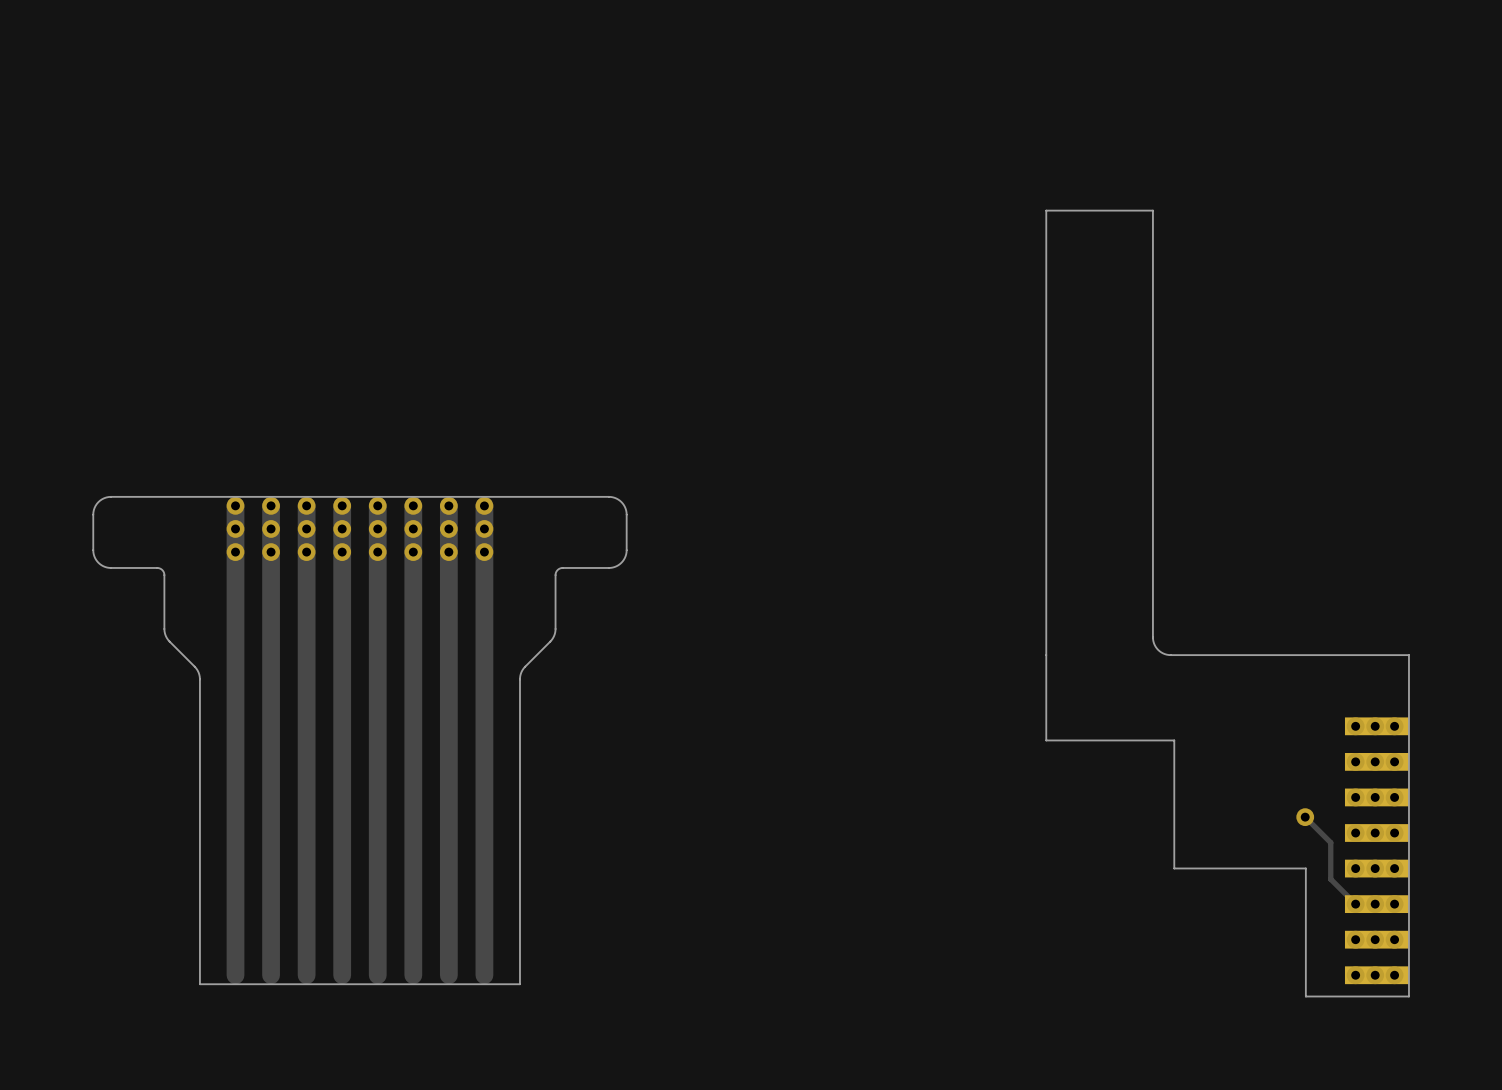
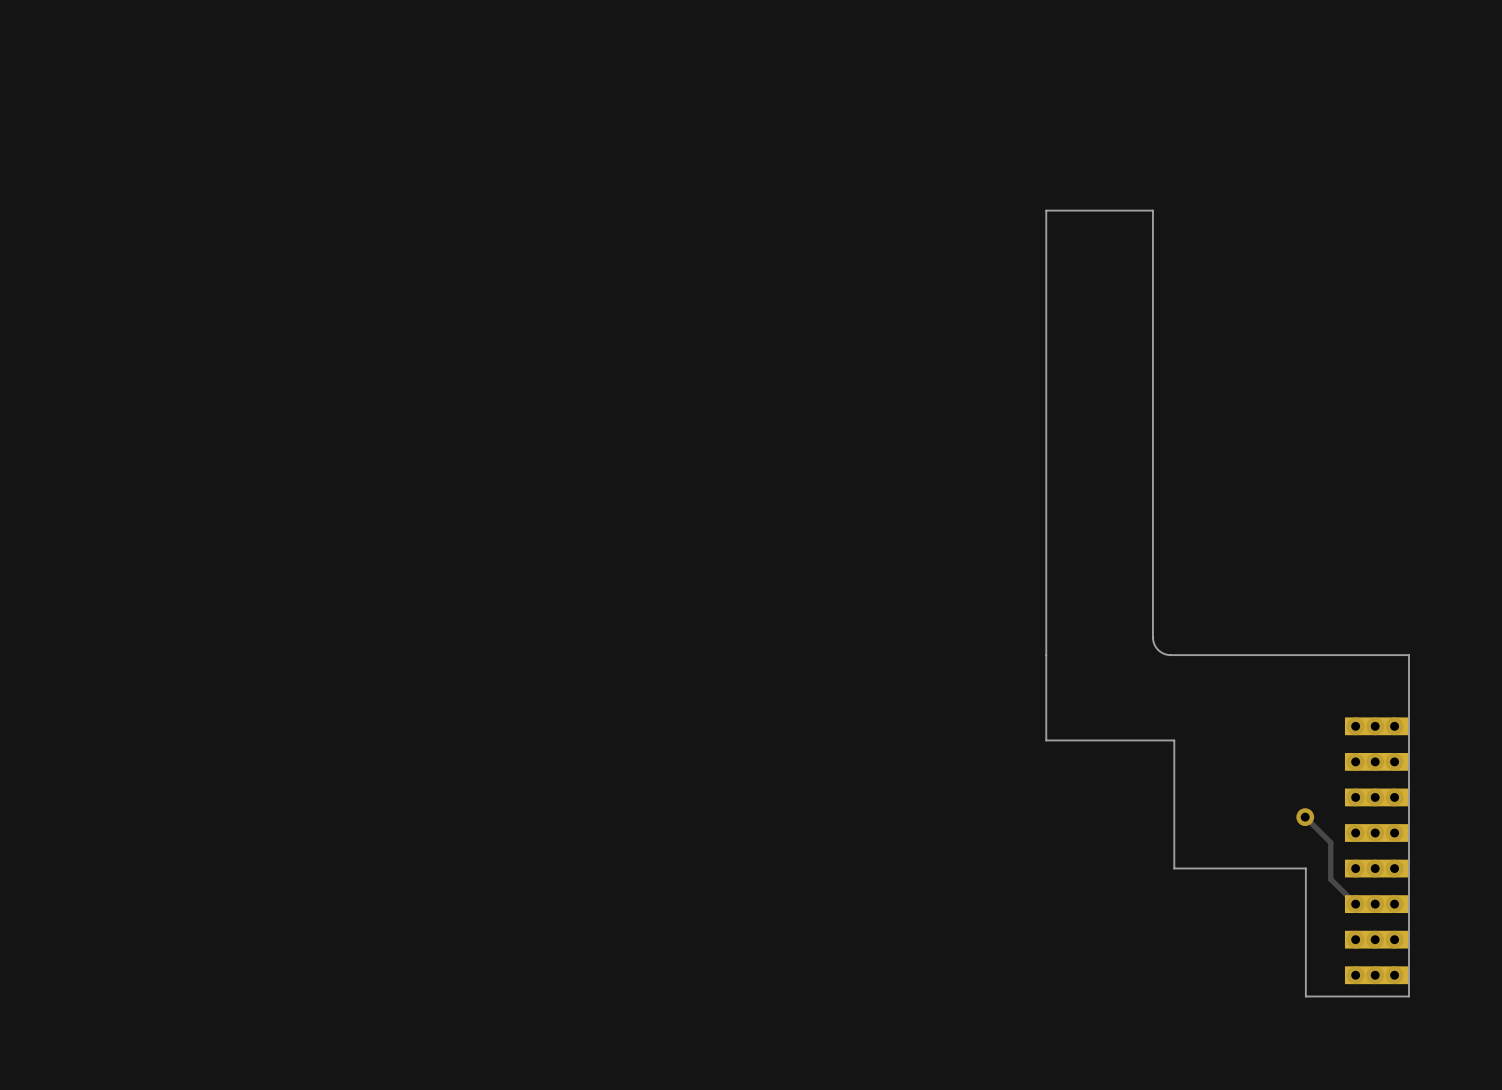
board edge: (608, 496) (111, 496) (104, 498) (96, 503) (93, 514) (93, 552) (95, 559) (101, 565) (109, 567) (157, 567) (162, 570) (164, 575) (165, 635) (196, 668) (199, 674) (199, 984) (519, 984) (520, 675) (524, 667) (550, 641) (554, 634) (555, 575) (557, 570) (562, 567) (612, 567) (619, 564) (624, 557) (626, 550) (626, 510) (619, 500) (608, 496) -> none
track: (235, 505) (235, 975) -> none
via: (235, 505) -> none
track: (271, 505) (271, 975) -> none
via: (271, 505) -> none
track: (306, 505) (306, 975) -> none
via: (306, 505) -> none
track: (342, 505) (342, 975) -> none
via: (342, 505) -> none
track: (377, 505) (377, 975) -> none
via: (377, 505) -> none
track: (413, 505) (413, 975) -> none
via: (413, 505) -> none
track: (448, 505) (448, 975) -> none
via: (448, 505) -> none
track: (484, 505) (484, 975) -> none
via: (484, 505) -> none
via: (235, 528) -> none
via: (271, 528) -> none
via: (306, 528) -> none
via: (342, 528) -> none
via: (377, 528) -> none
via: (413, 528) -> none
via: (448, 528) -> none
via: (484, 528) -> none
via: (235, 552) -> none
via: (271, 552) -> none
via: (306, 552) -> none
via: (342, 552) -> none
via: (377, 552) -> none
via: (413, 552) -> none
via: (448, 552) -> none
via: (484, 552) -> none

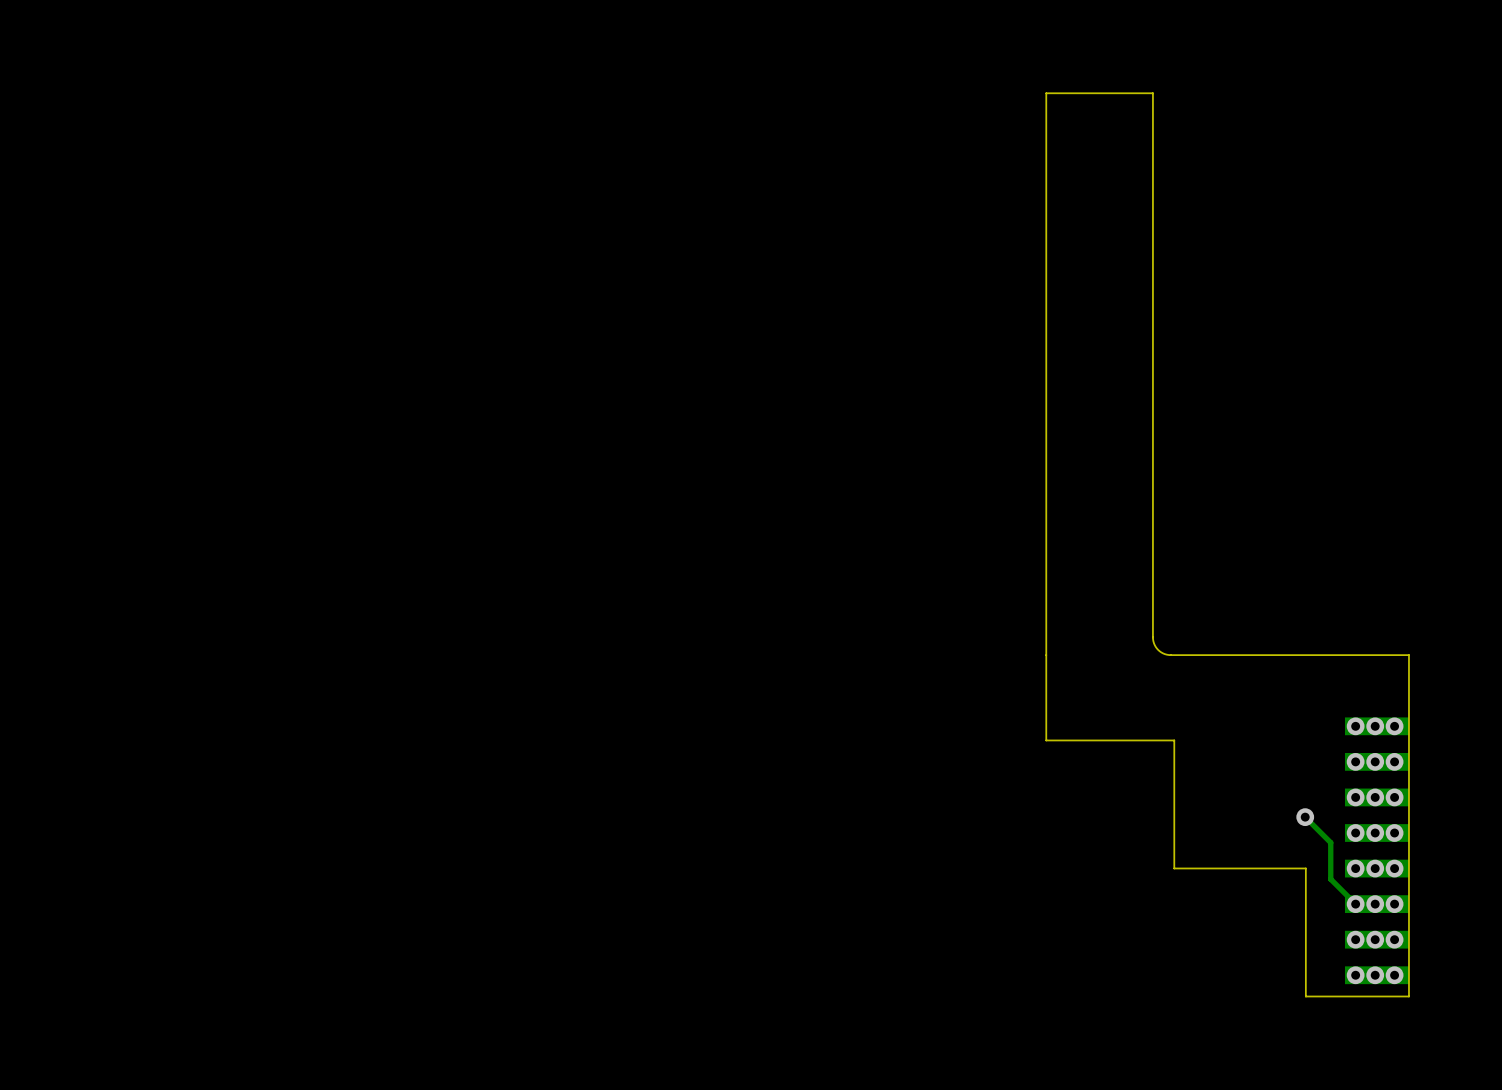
board edge: (1152, 210) (1046, 210) -> (1152, 210) (1152, 93) (1046, 93) (1046, 210)

